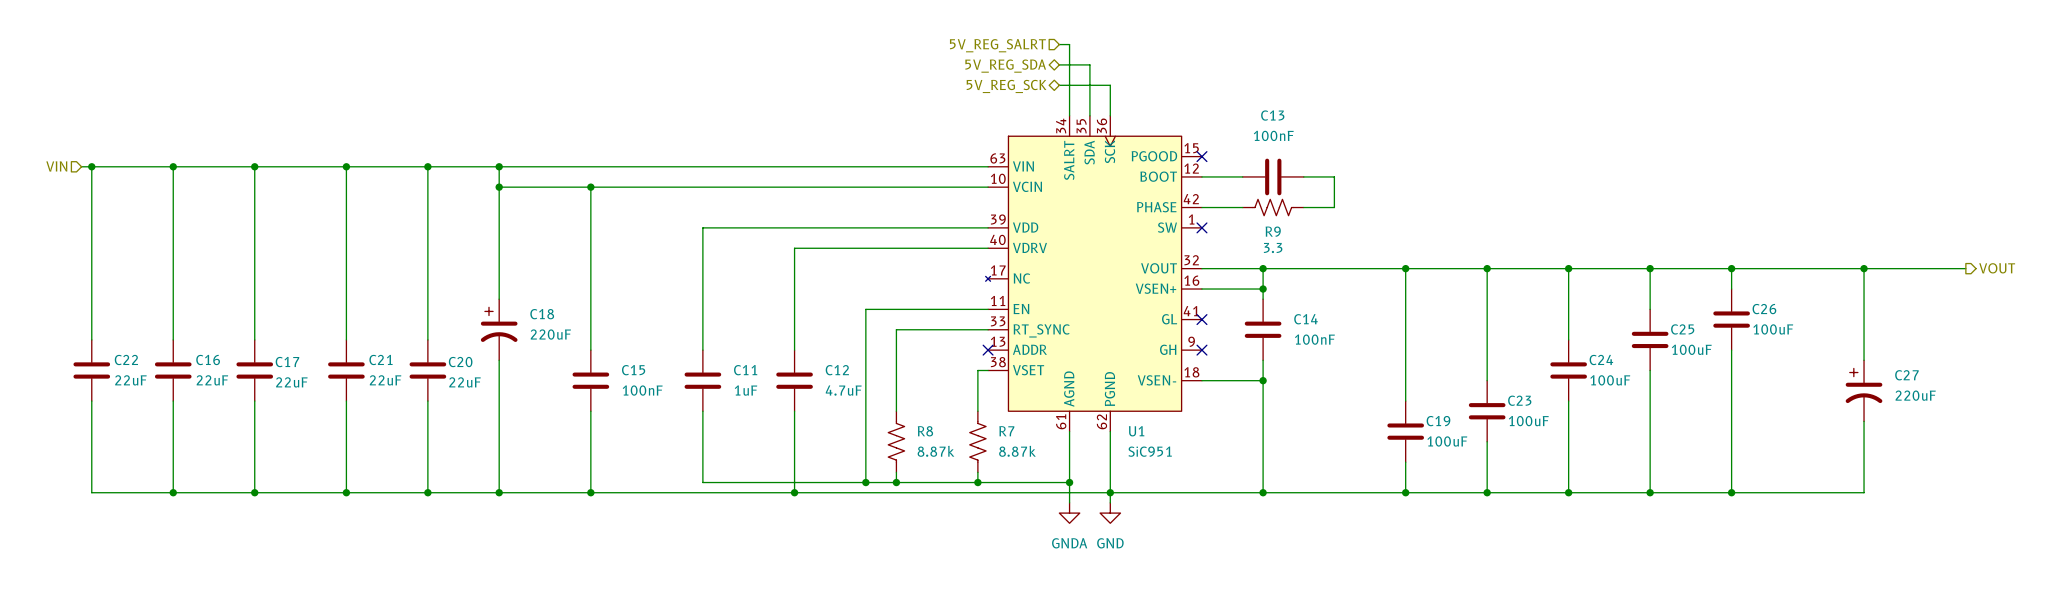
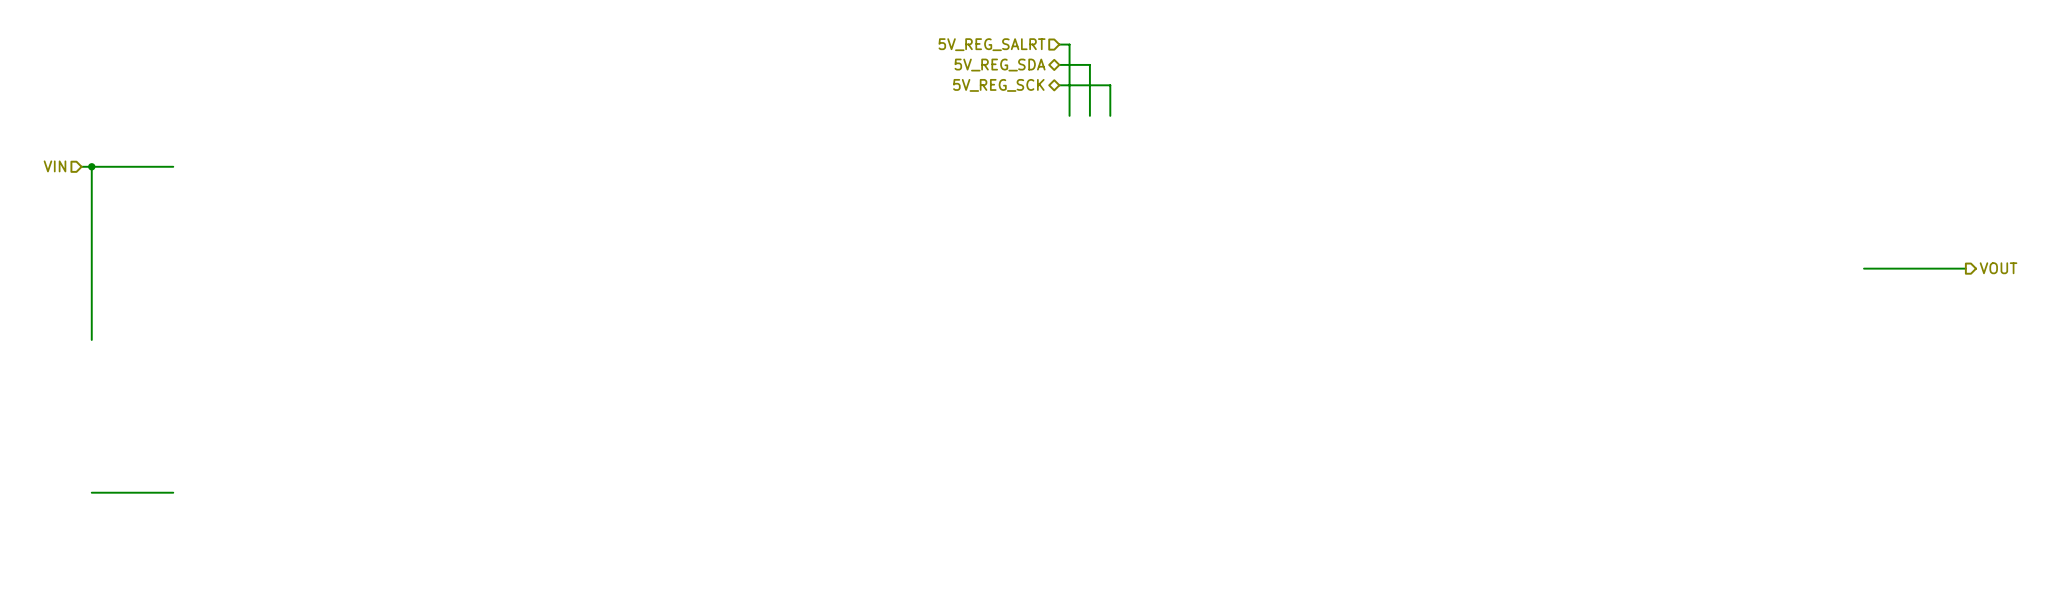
no-connect mark: (1201, 156) -> none
junction: (173, 166) -> none
wire: (254, 166) (254, 339) -> none
junction: (254, 166) -> none
wire: (346, 166) (346, 339) -> none
junction: (346, 166) -> none
wire: (427, 166) (427, 339) -> none
junction: (427, 166) -> none
wire: (499, 166) (499, 299) -> none
junction: (499, 166) -> none
wire: (988, 166) (173, 166) (173, 339) -> none
wire: (1201, 176) (1242, 176) -> none
C13: 100nF (1273, 176) -> none
wire: (1303, 176) (1334, 176) (1334, 207) (1303, 207) -> none
wire: (499, 187) (988, 187) -> none
junction: (499, 187) -> none
wire: (590, 187) (590, 350) -> none
junction: (590, 187) -> none
wire: (1201, 207) (1242, 207) -> none
R9: 3.3 (1273, 207) -> none
wire: (988, 227) (702, 227) (702, 350) -> none
no-connect mark: (1201, 227) -> none
wire: (988, 248) (794, 248) (794, 350) -> none
wire: (1201, 268) (1864, 268) (1864, 360) -> none
wire: (1263, 268) (1263, 299) -> none
junction: (1263, 268) -> none
wire: (1405, 268) (1405, 401) -> none
junction: (1405, 268) -> none
wire: (1487, 268) (1487, 380) -> none
junction: (1487, 268) -> none
wire: (1568, 268) (1568, 339) -> none
junction: (1568, 268) -> none
wire: (1650, 268) (1650, 309) -> none
junction: (1650, 268) -> none
wire: (1731, 268) (1731, 289) -> none
junction: (1731, 268) -> none
junction: (1864, 268) -> none
U1: SiC951 (1093, 273) -> none
wire: (1201, 289) (1263, 289) -> none
junction: (1263, 289) -> none
wire: (988, 309) (865, 309) (865, 482) -> none
no-connect mark: (1201, 319) -> none
C26: 100uF (1731, 319) -> none
C18: 220uF (499, 329) -> none
wire: (988, 329) (896, 329) (896, 411) -> none
C14: 100nF (1263, 329) -> none
C25: 100uF (1650, 339) -> none
no-connect mark: (988, 350) -> none
no-connect mark: (1201, 350) -> none
wire: (1731, 350) (1731, 492) -> none
wire: (499, 360) (499, 492) -> none
wire: (1263, 360) (1263, 492) -> none
C22: 22uF (91, 370) -> none
C16: 22uF (173, 370) -> none
C17: 22uF (254, 370) -> none
C21: 22uF (346, 370) -> none
C20: 22uF (427, 370) -> none
wire: (988, 370) (977, 370) (977, 411) -> none
C24: 100uF (1568, 370) -> none
wire: (1650, 370) (1650, 492) -> none
C15: 100nF (590, 380) -> none
C11: 1uF (702, 380) -> none
C12: 4.7uF (794, 380) -> none
wire: (1201, 380) (1263, 380) -> none
junction: (1263, 380) -> none
C27: 220uF (1864, 390) -> none
wire: (91, 401) (91, 492) -> none
wire: (173, 401) (173, 492) (1864, 492) (1864, 421) -> none
wire: (254, 401) (254, 492) -> none
wire: (346, 401) (346, 492) -> none
wire: (427, 401) (427, 492) -> none
wire: (1568, 401) (1568, 492) -> none
wire: (590, 411) (590, 492) -> none
wire: (702, 411) (702, 482) (1069, 482) -> none
wire: (794, 411) (794, 492) -> none
C23: 100uF (1487, 411) -> none
wire: (1069, 431) (1069, 502) -> none
wire: (1110, 431) (1110, 502) -> none
C19: 100uF (1405, 431) -> none
R8: 8.87k (896, 441) -> none
R7: 8.87k (977, 441) -> none
wire: (1487, 441) (1487, 492) -> none
wire: (1405, 462) (1405, 492) -> none
wire: (896, 472) (896, 482) -> none
wire: (977, 472) (977, 482) -> none
junction: (865, 482) -> none
junction: (896, 482) -> none
junction: (977, 482) -> none
junction: (1069, 482) -> none
junction: (173, 492) -> none
junction: (254, 492) -> none
junction: (346, 492) -> none
junction: (427, 492) -> none
junction: (499, 492) -> none
junction: (590, 492) -> none
junction: (794, 492) -> none
junction: (1110, 492) -> none
junction: (1263, 492) -> none
junction: (1405, 492) -> none
junction: (1487, 492) -> none
junction: (1568, 492) -> none
junction: (1650, 492) -> none
junction: (1731, 492) -> none
power symbol: GNDA (1069, 513) -> none
power symbol: GND (1110, 513) -> none

